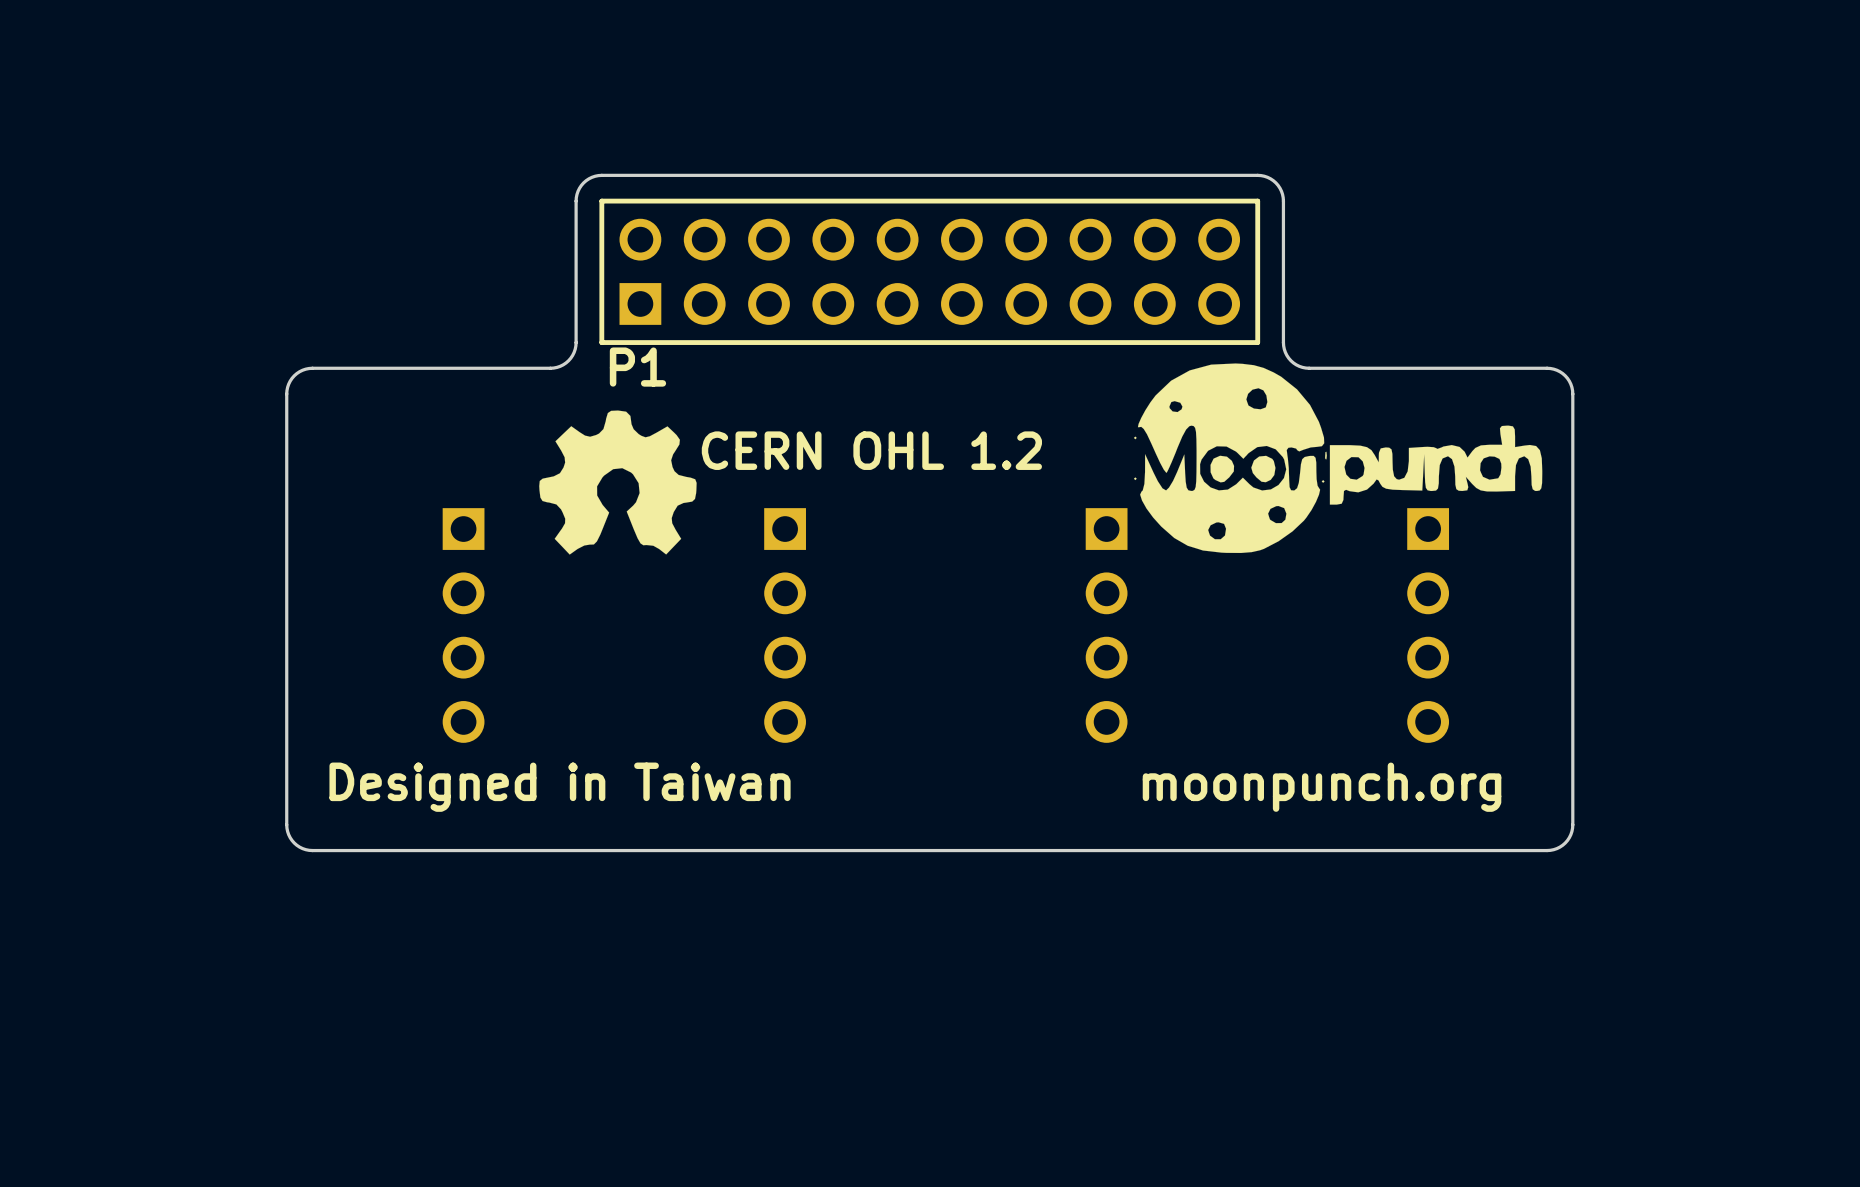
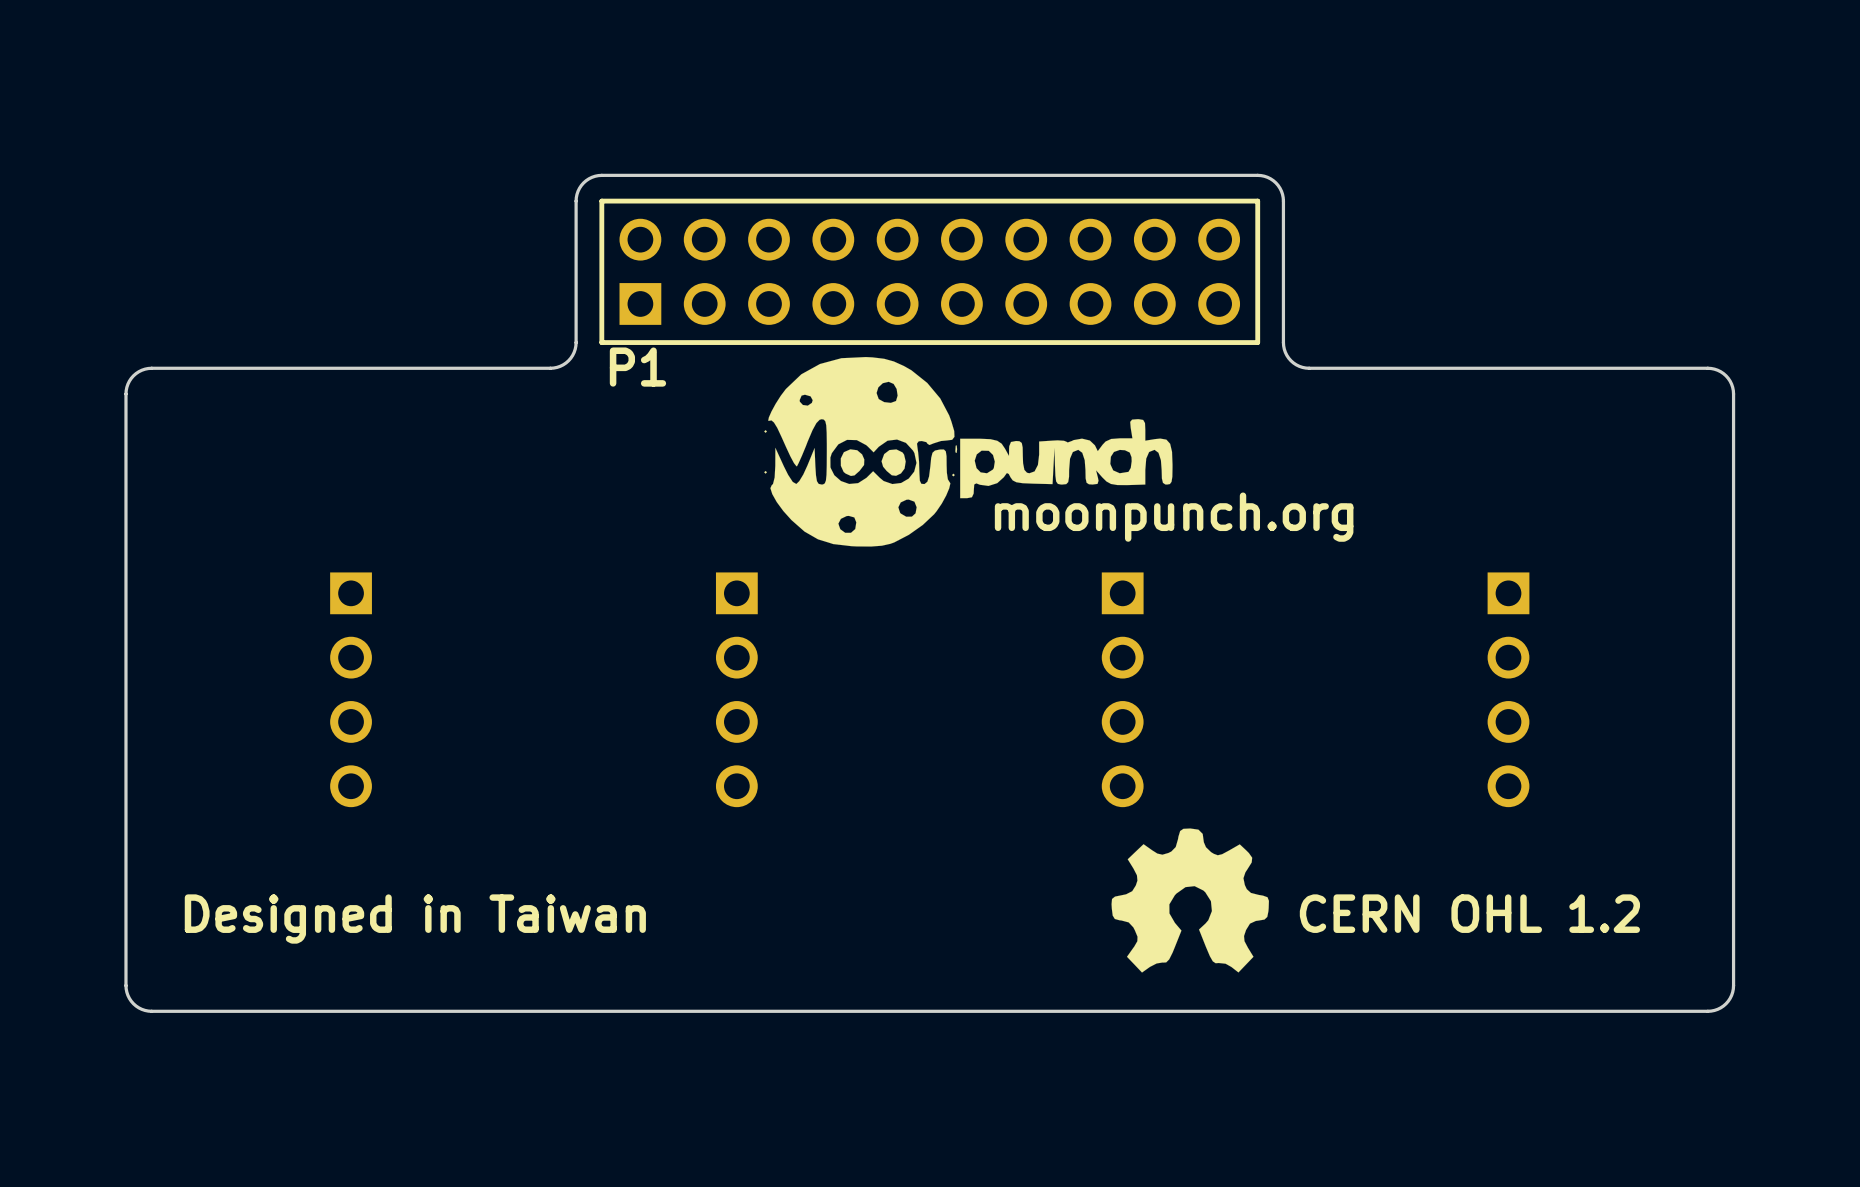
board edge: (1547, 368) (1556, 370) (1565, 375) (1570, 384) (1572, 394) (1572, 824) (1570, 834) (1565, 843) (1556, 848) (1547, 850) (312, 850) (302, 848) (292, 840) (286, 824) (286, 394) (288, 384) (294, 375) (302, 370) (312, 368) -> (1547, 368) (1711, 368) (1723, 373) (1732, 387) (1733, 985) (1728, 1001) (1714, 1010) (151, 1011) (141, 1009) (131, 1001) (125, 985) (126, 387) (136, 373) (148, 368) (312, 368)
text position: CERN OHL 1.2 (871, 450) -> CERN OHL 1.2 (1469, 913)
drawing position: (1338, 458) -> (968, 451)
drawing position: (617, 482) -> (1190, 900)
part position: (463, 625) -> (351, 689)
part position: (785, 625) -> (736, 689)
part position: (1106, 625) -> (1122, 689)
part position: (1428, 625) -> (1508, 689)
text position: Designed in Taiwan (560, 787) -> Designed in Taiwan (415, 919)
text position: moonpunch.org (1322, 787) -> moonpunch.org (1174, 517)

